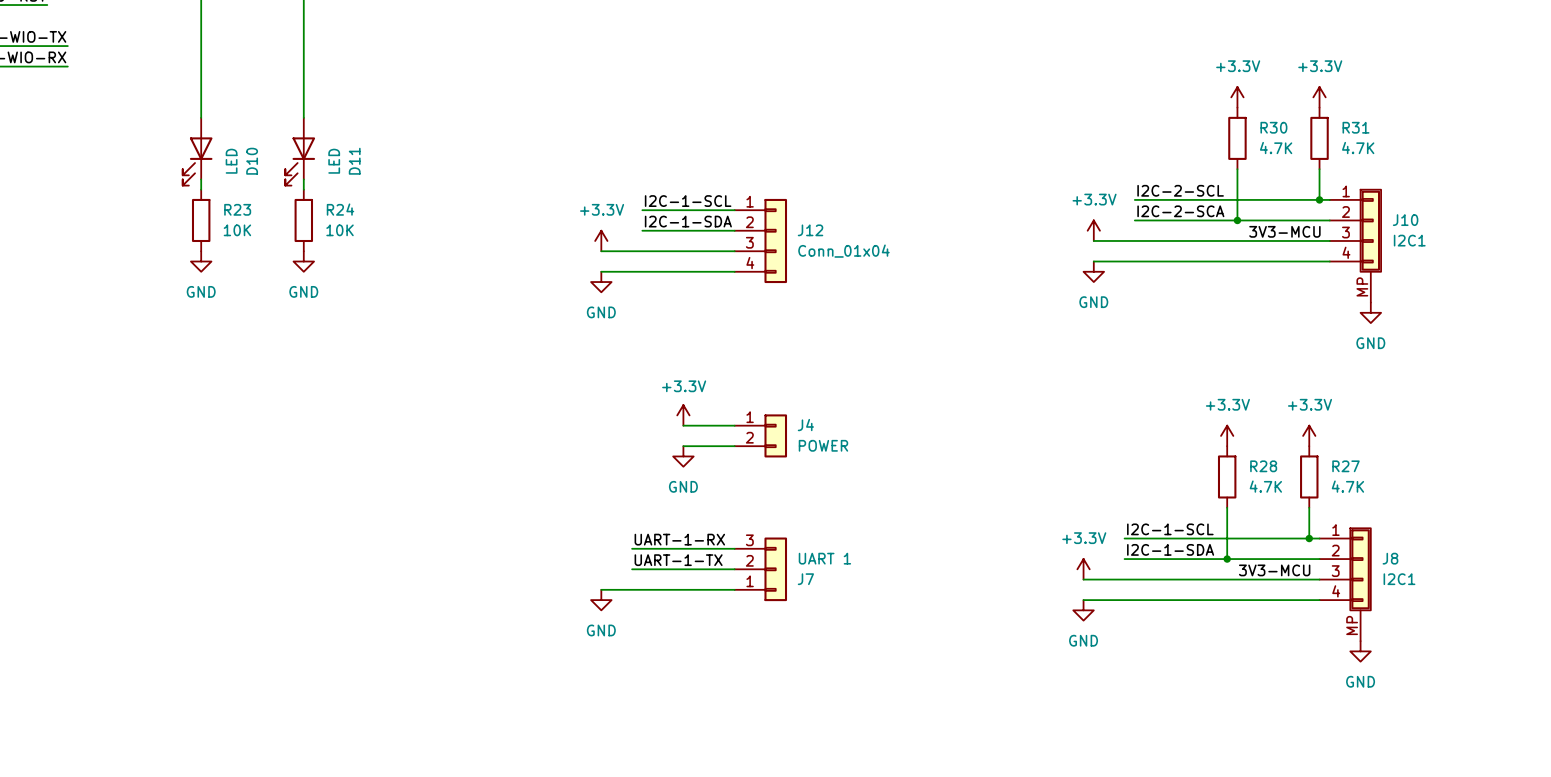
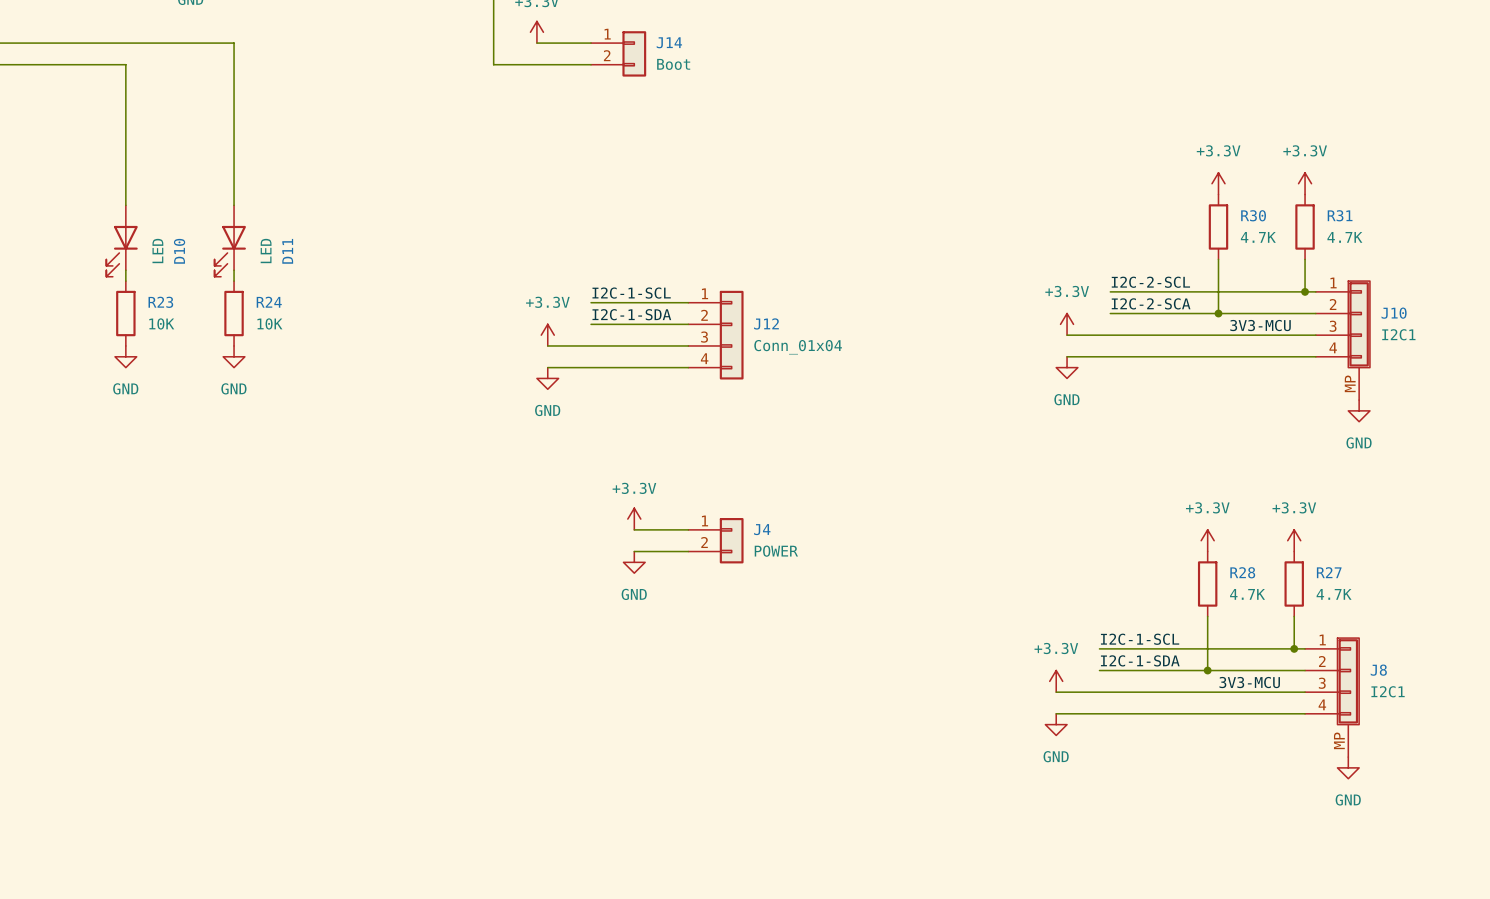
label: UART-1-RX (679, 539) -> none
wire: (632, 548) (734, 548) -> none
label: UART-1-TX (678, 560) -> none
wire: (632, 569) (734, 569) -> none
J7: UART 1 (760, 569) -> none
wire: (601, 589) (734, 589) -> none
power symbol: GND (601, 600) -> none

